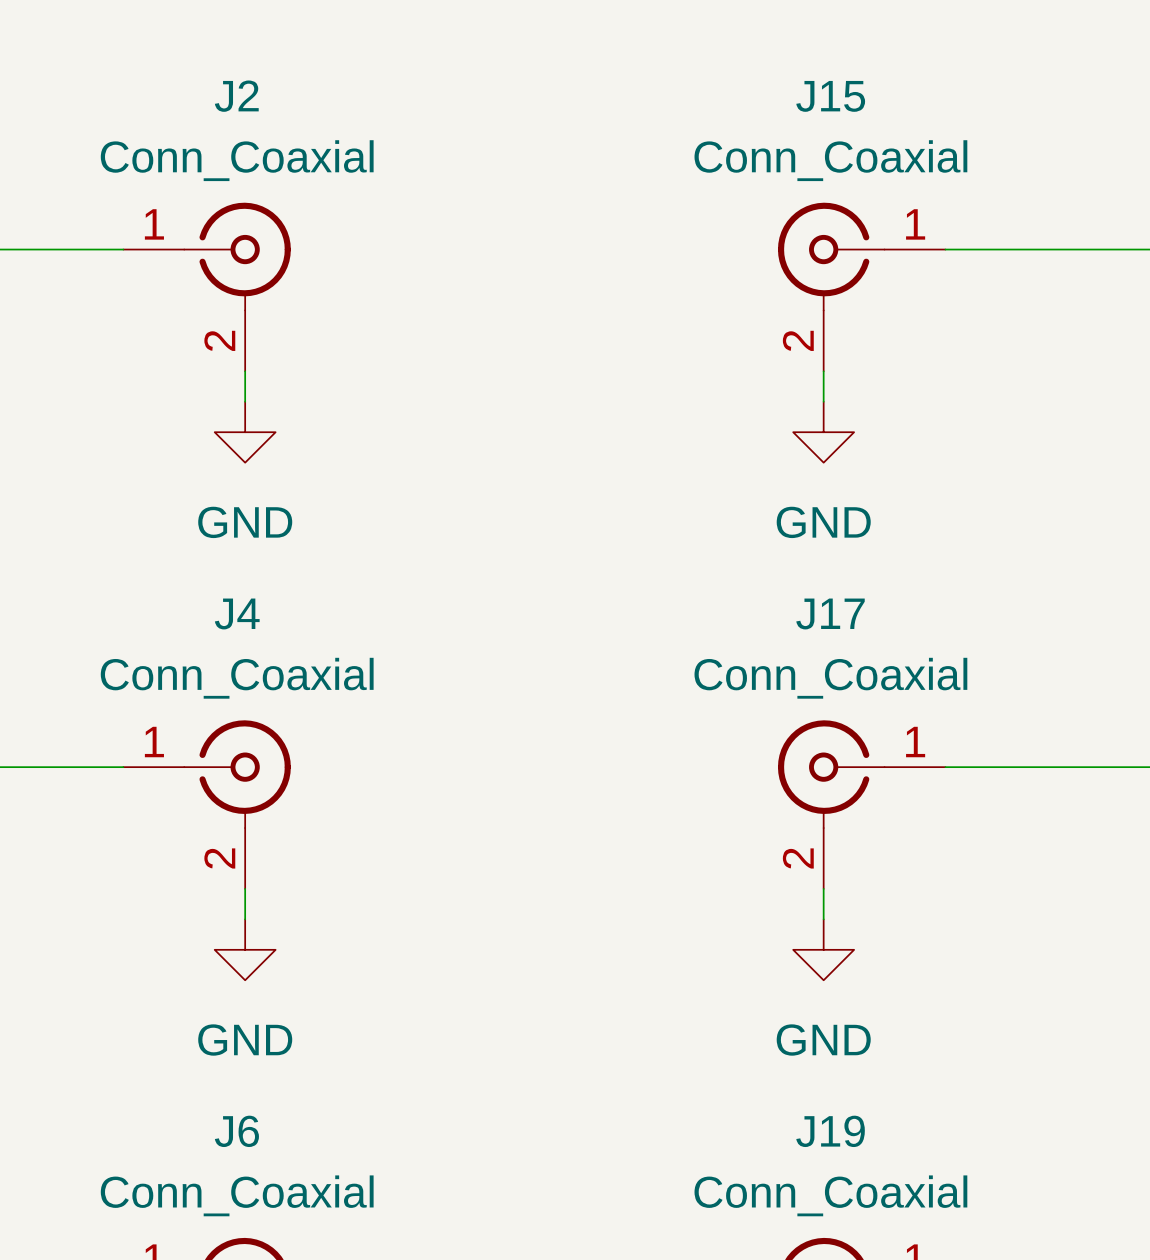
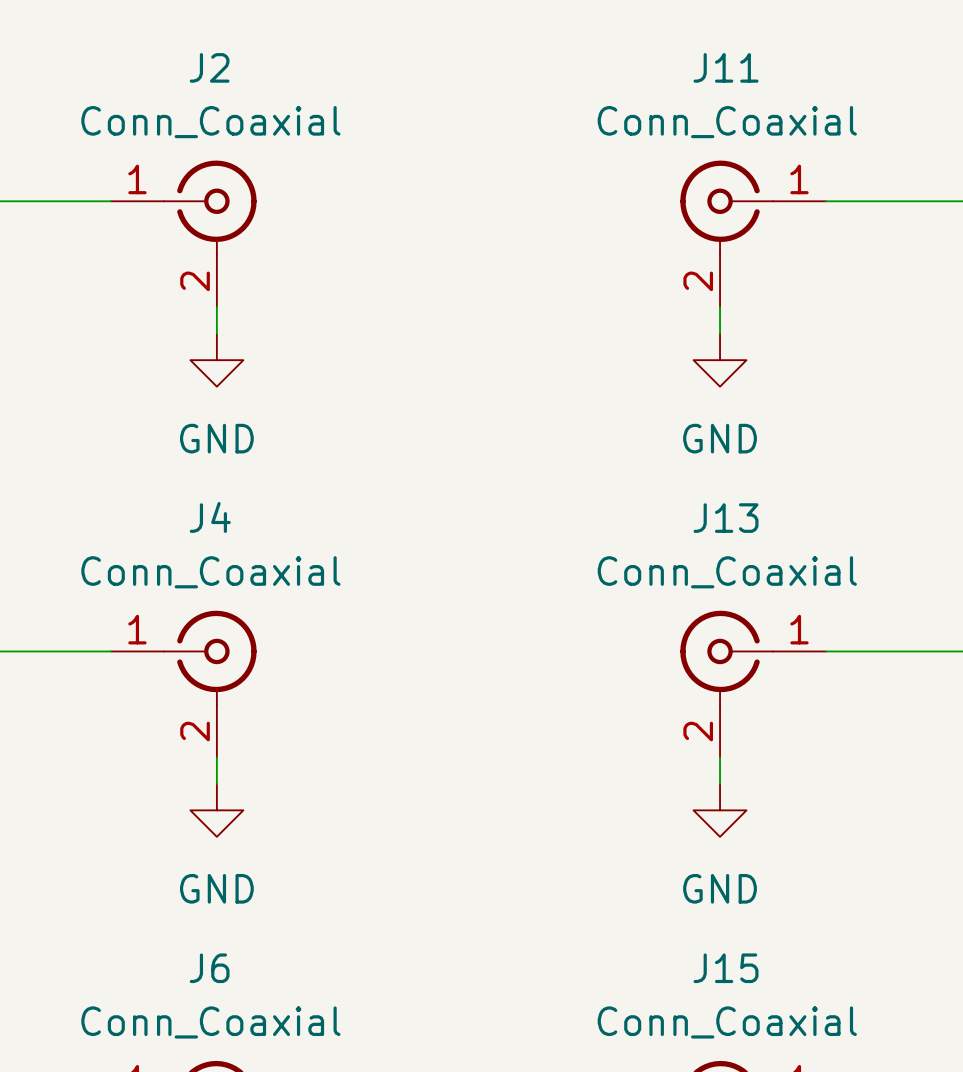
J15 name: J15 (830, 96) -> J11 (726, 67)
J17 name: J17 (830, 613) -> J13 (726, 518)
J19 name: J19 (830, 1131) -> J15 (726, 968)

